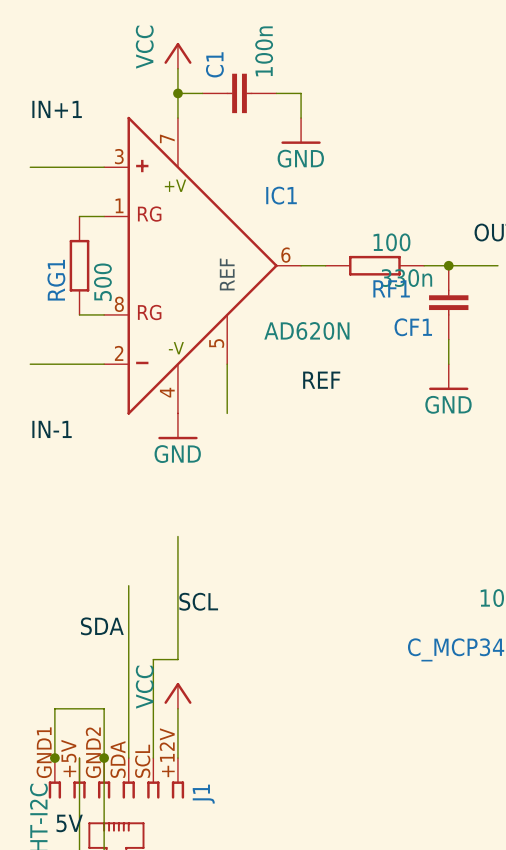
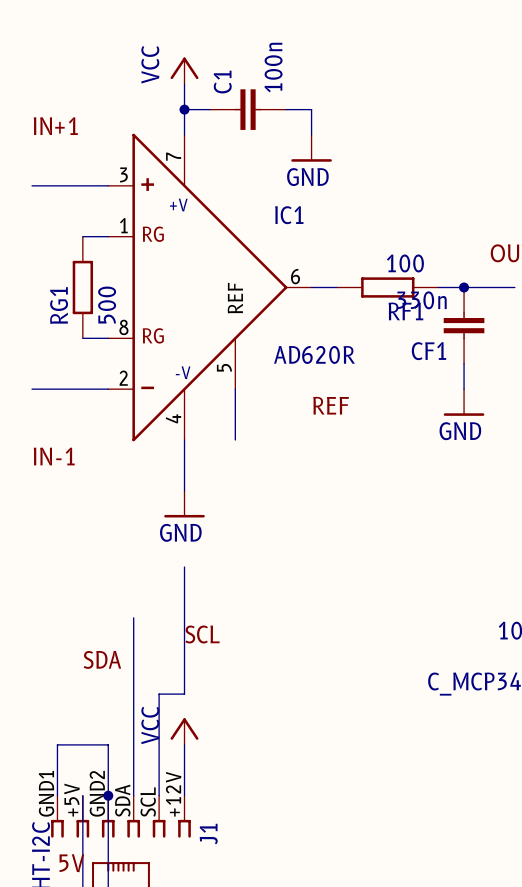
IC1 value: AD620N (306, 330) -> AD620R (314, 354)
power symbol position: GND (177, 426) -> GND (184, 504)
junction: (54, 758) -> none

